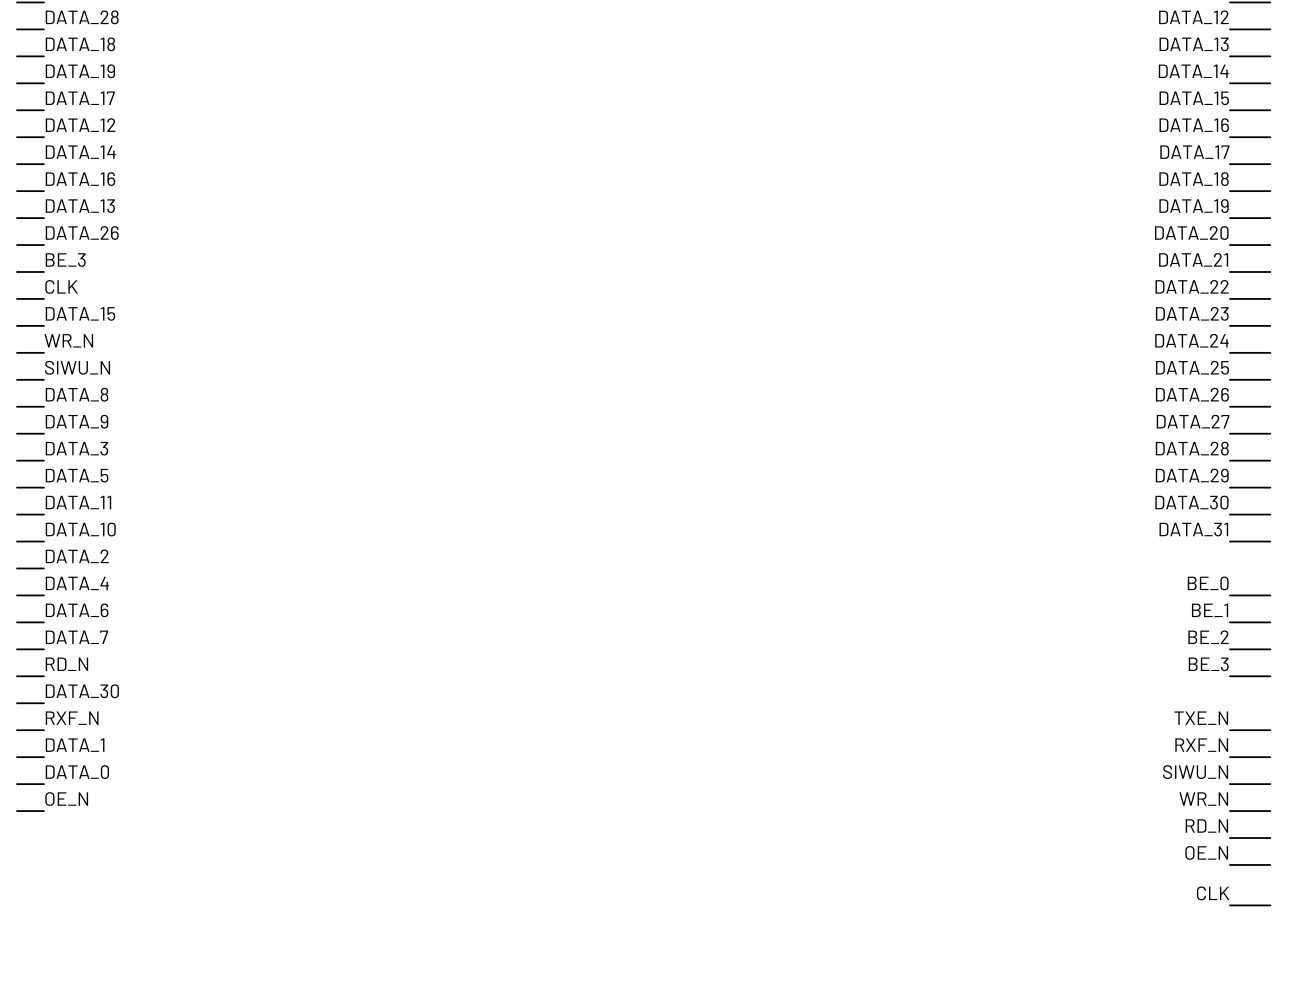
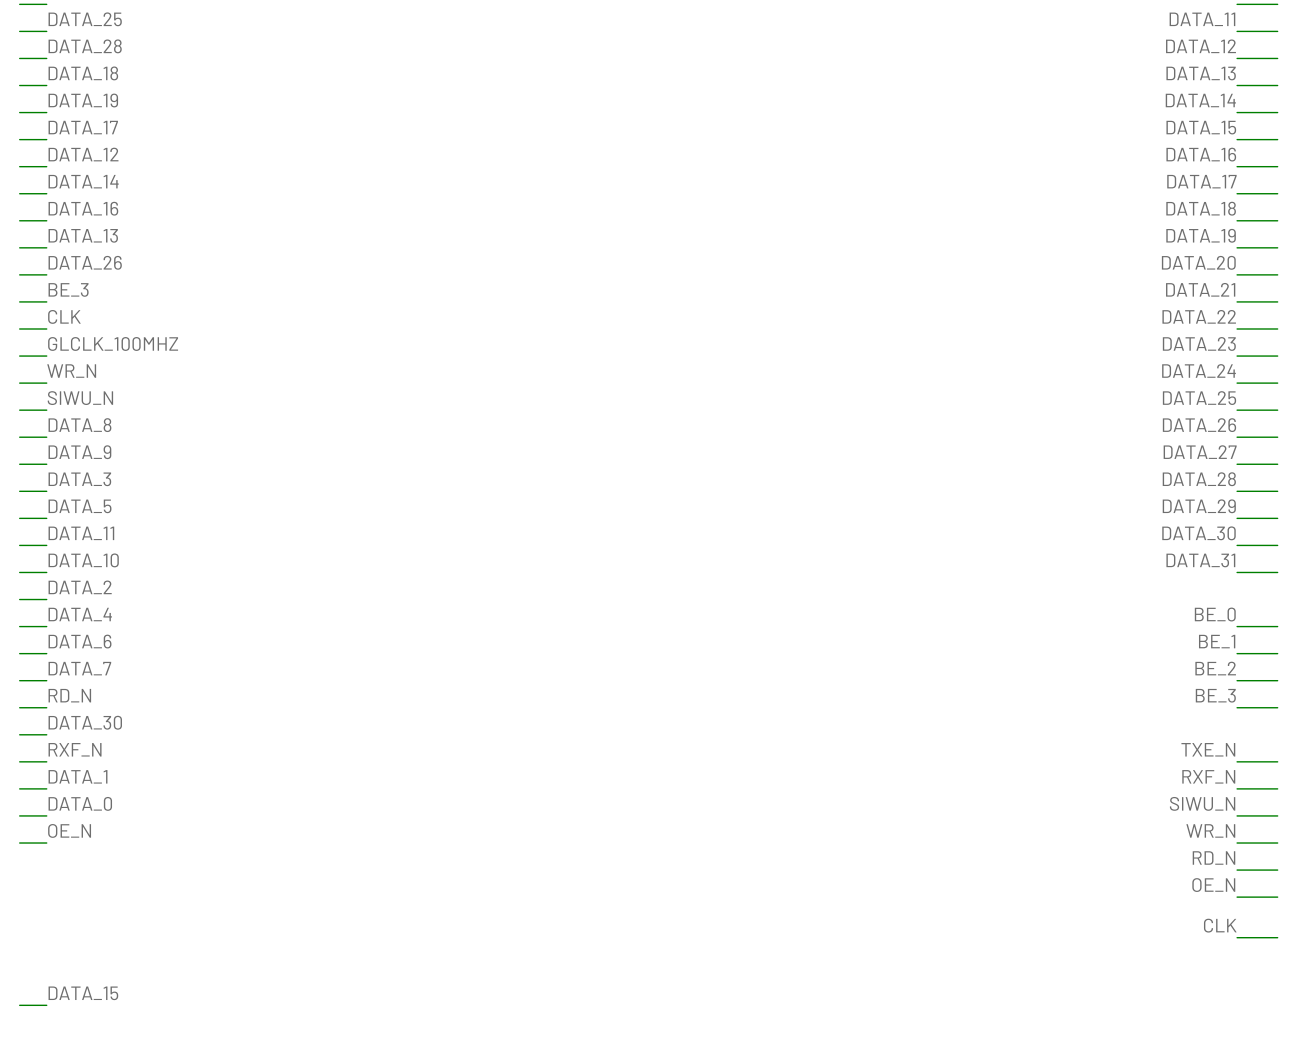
label: DATA_15 (80, 313) -> GLCLK_100MHZ (113, 343)
label: none -> DATA_15 (83, 993)
wire: none -> (19, 1005) (46, 1005)

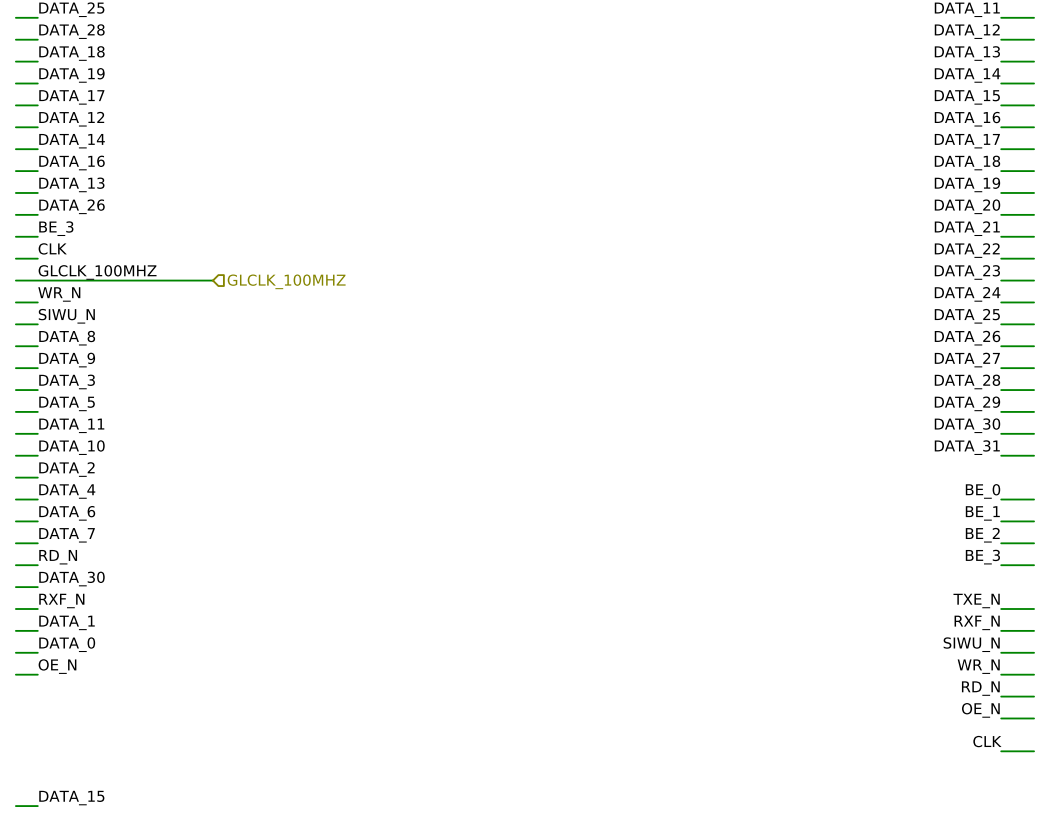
hierarchical label: none -> GLCLK_100MHZ (286, 281)
wire: none -> (37, 280) (212, 280)

